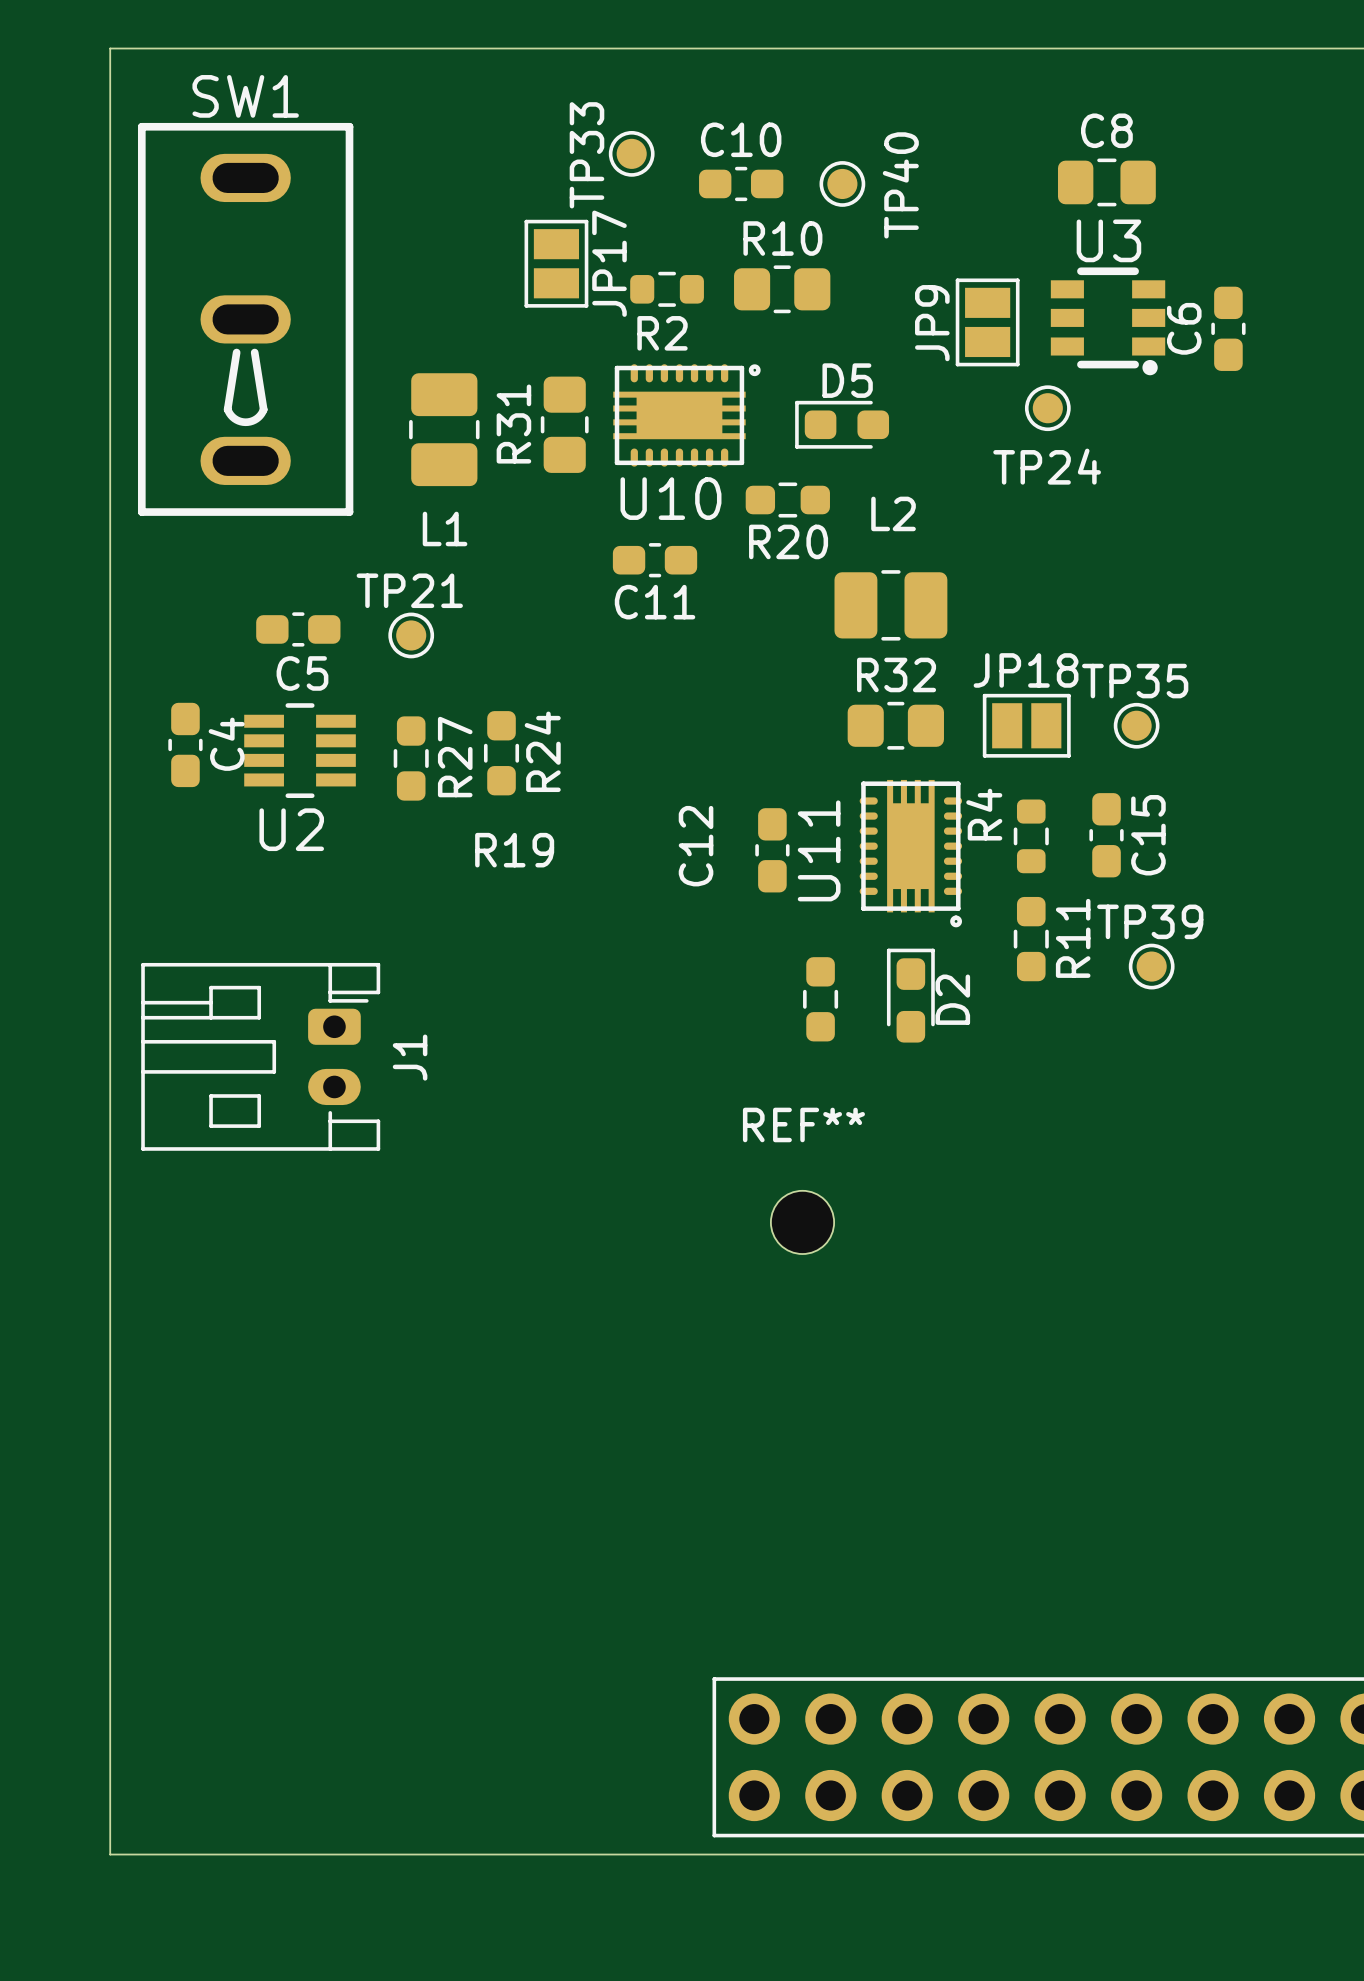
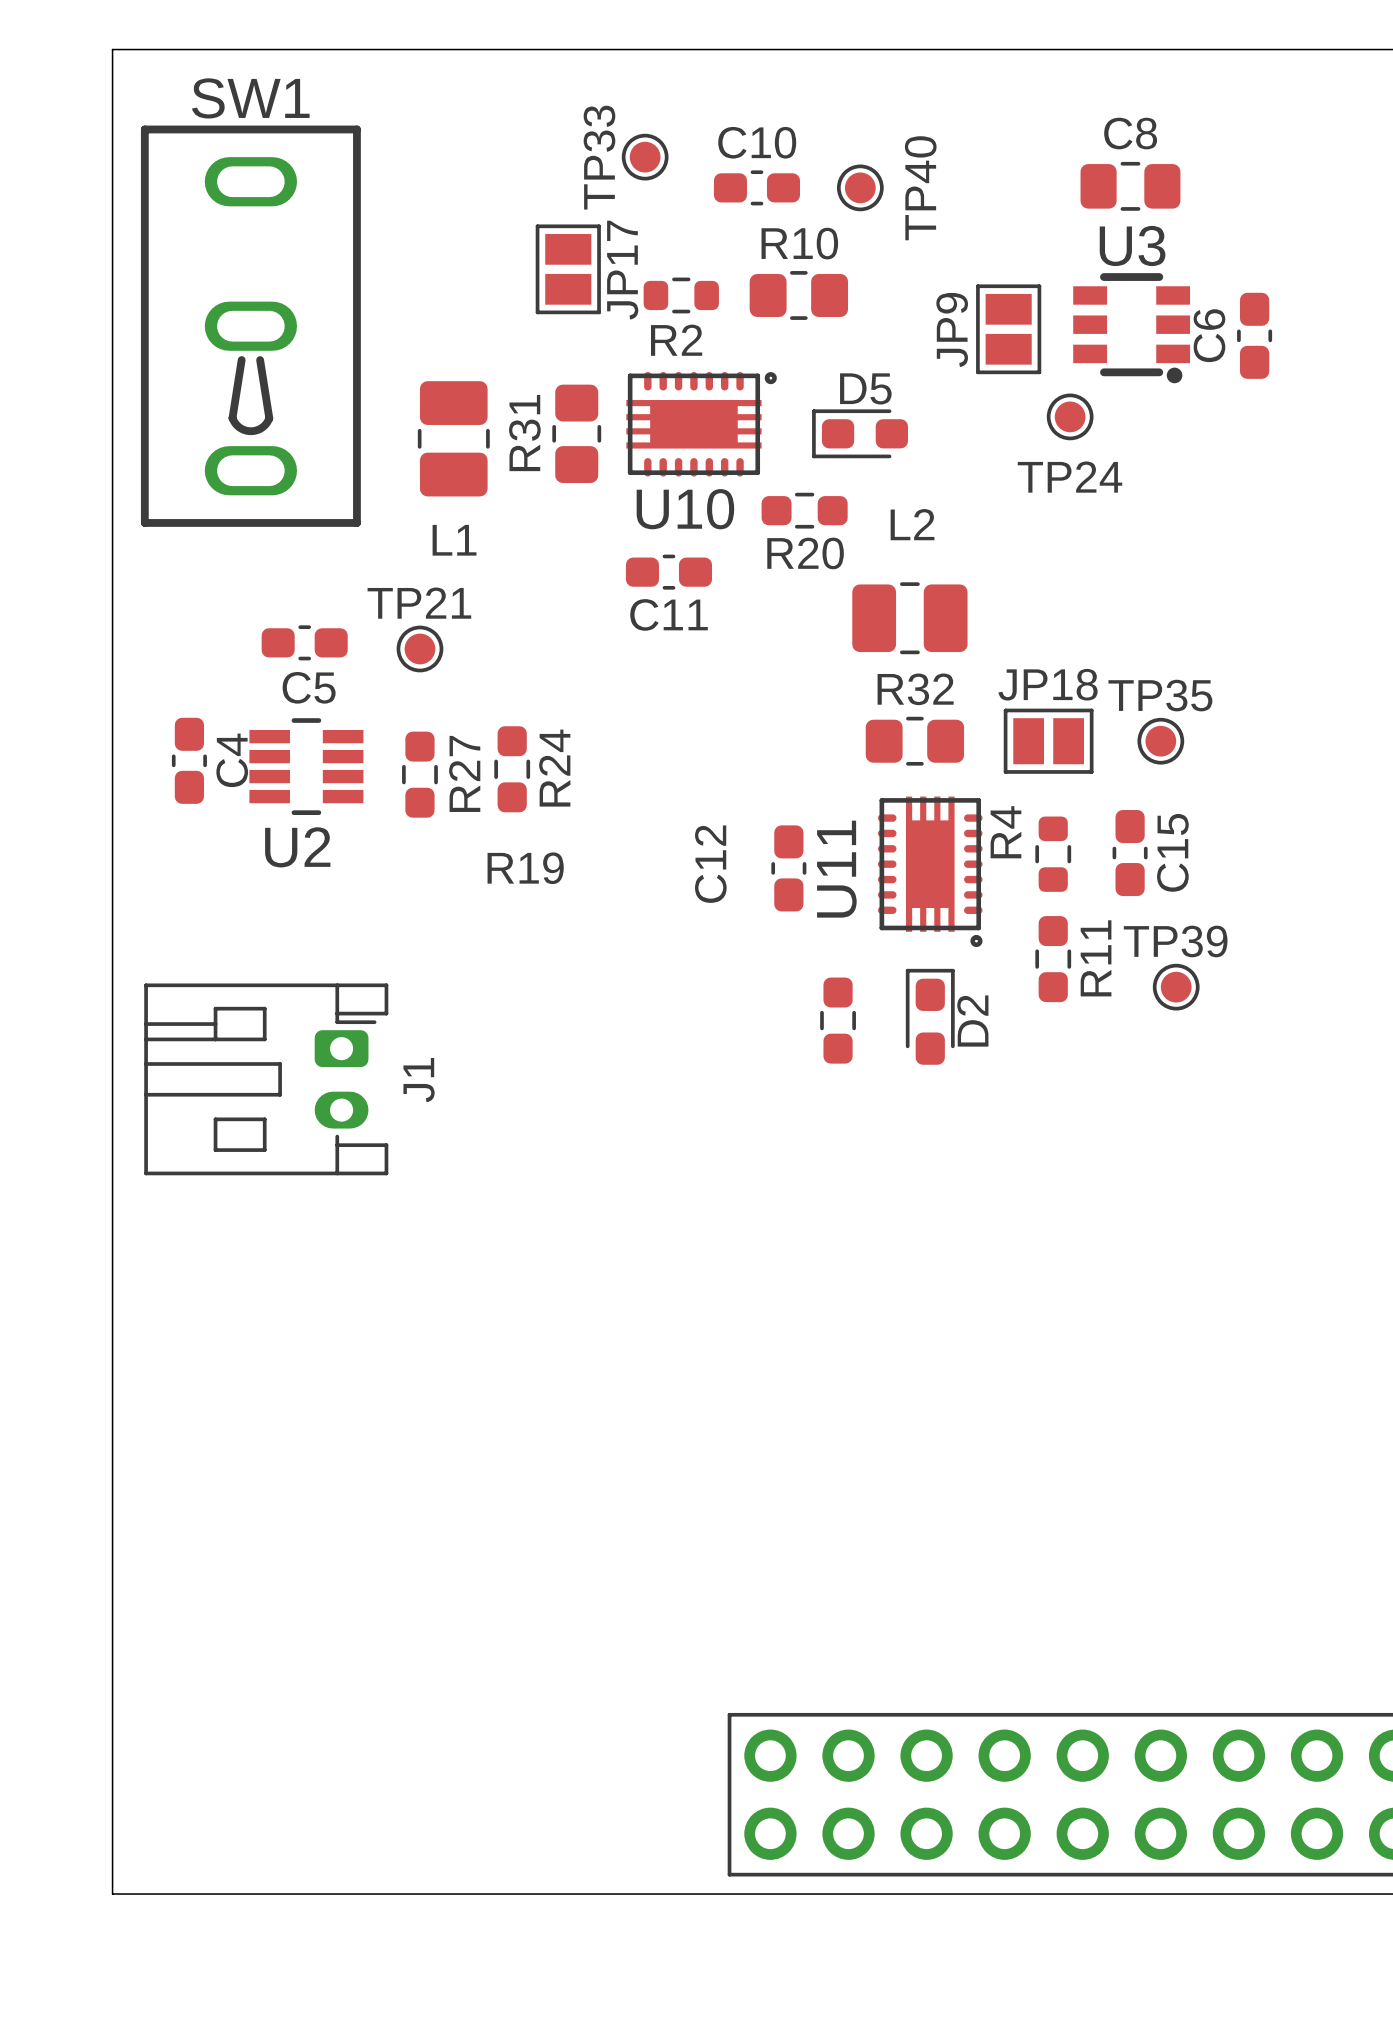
REF**: (802, 1222) -> none

